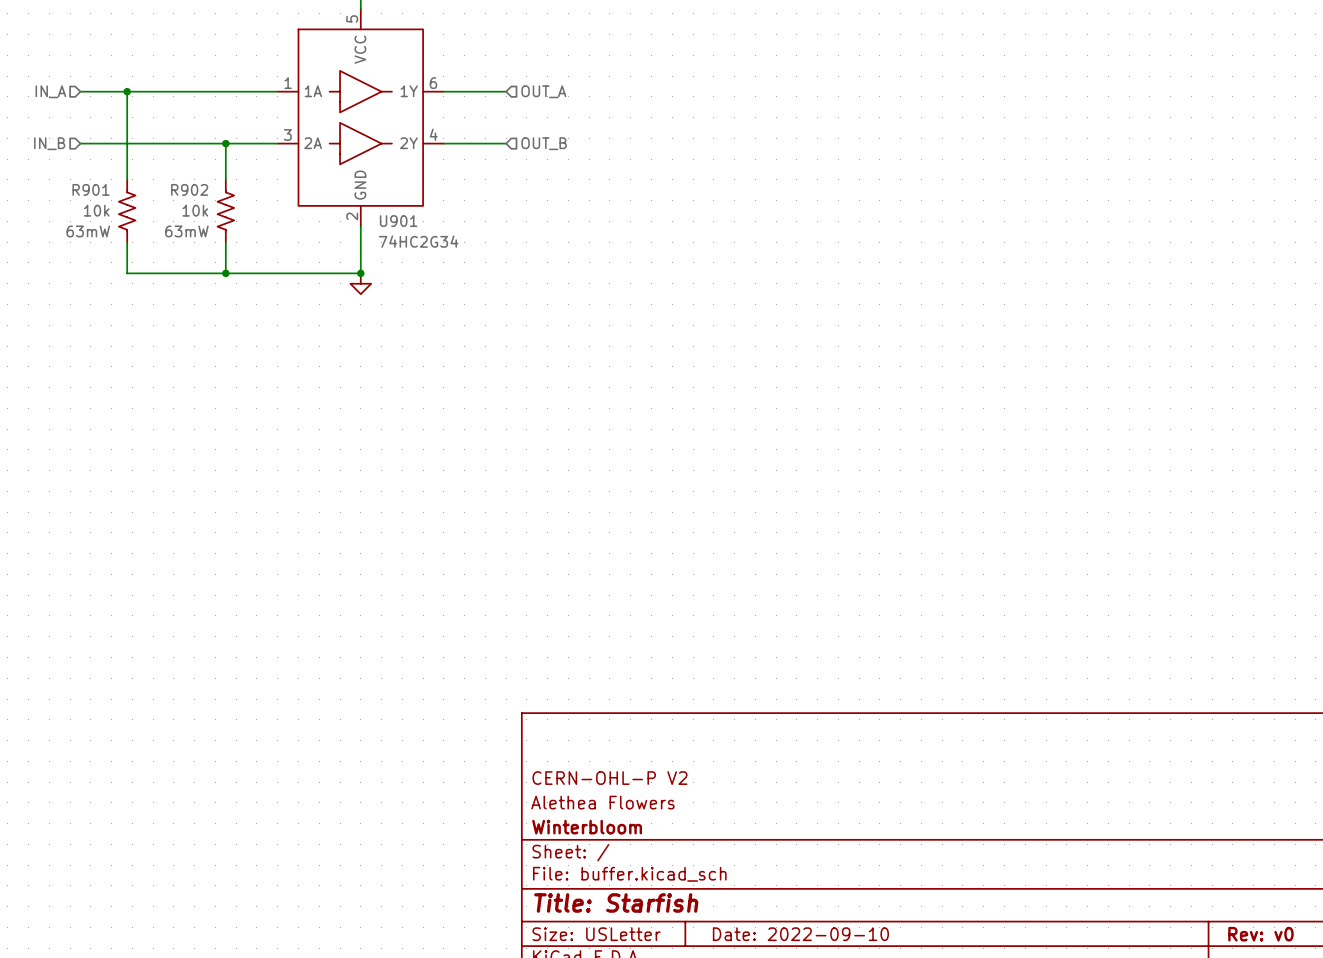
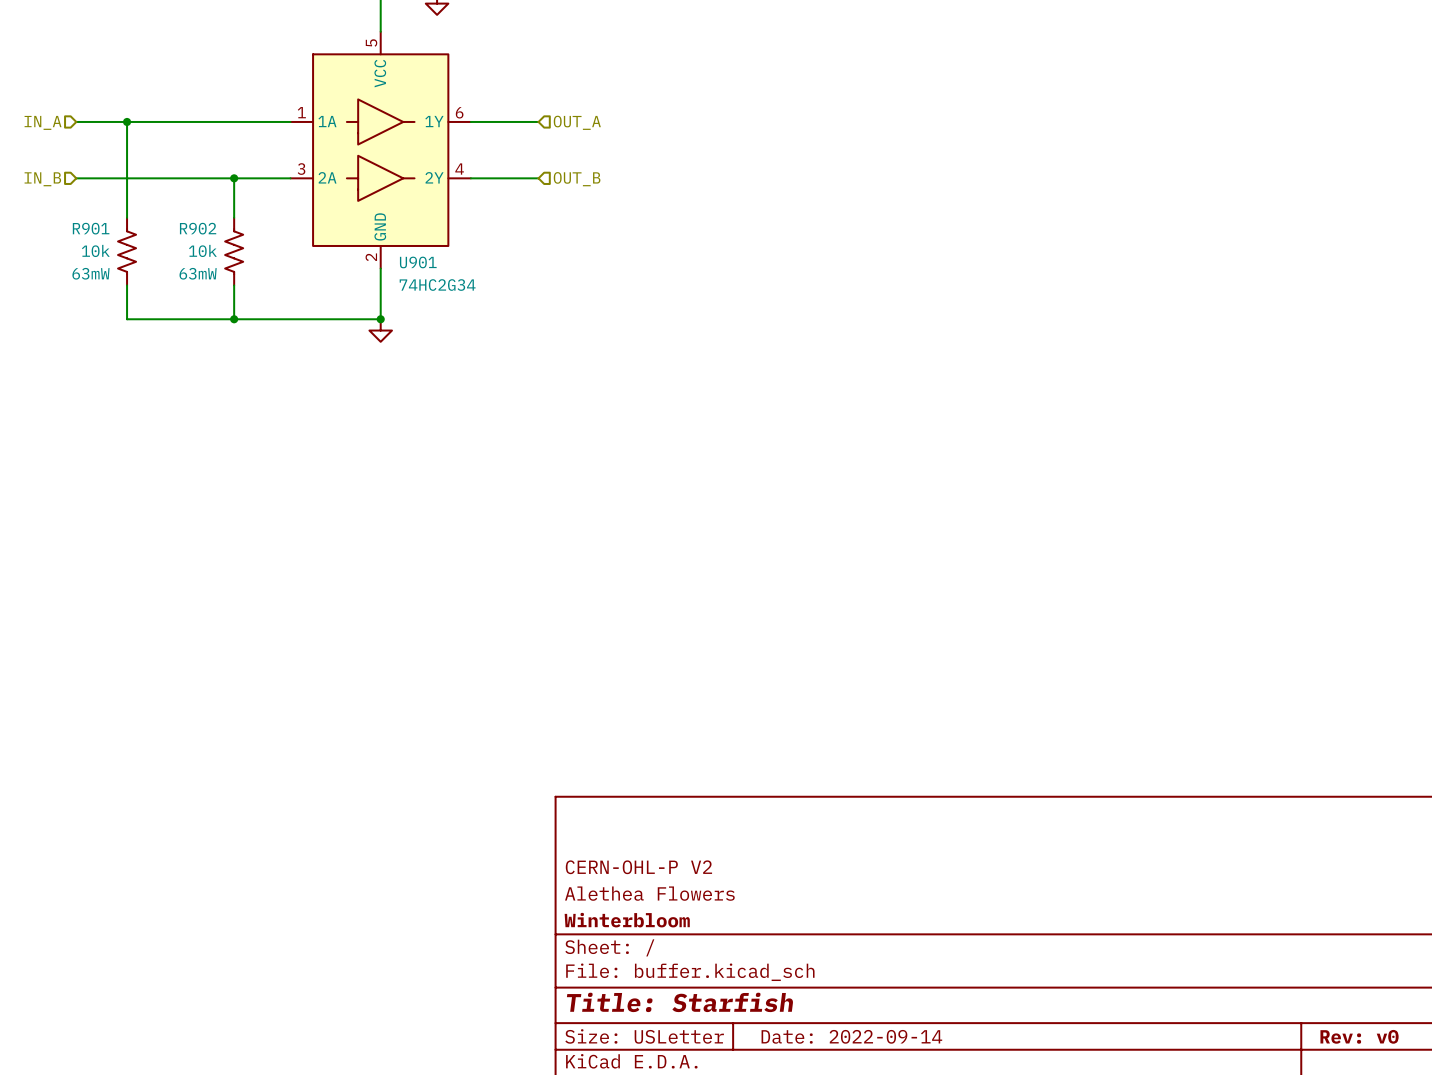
title block: Date: 2022-09-10 (800, 934) -> Date: 2022-09-14 (851, 1036)

